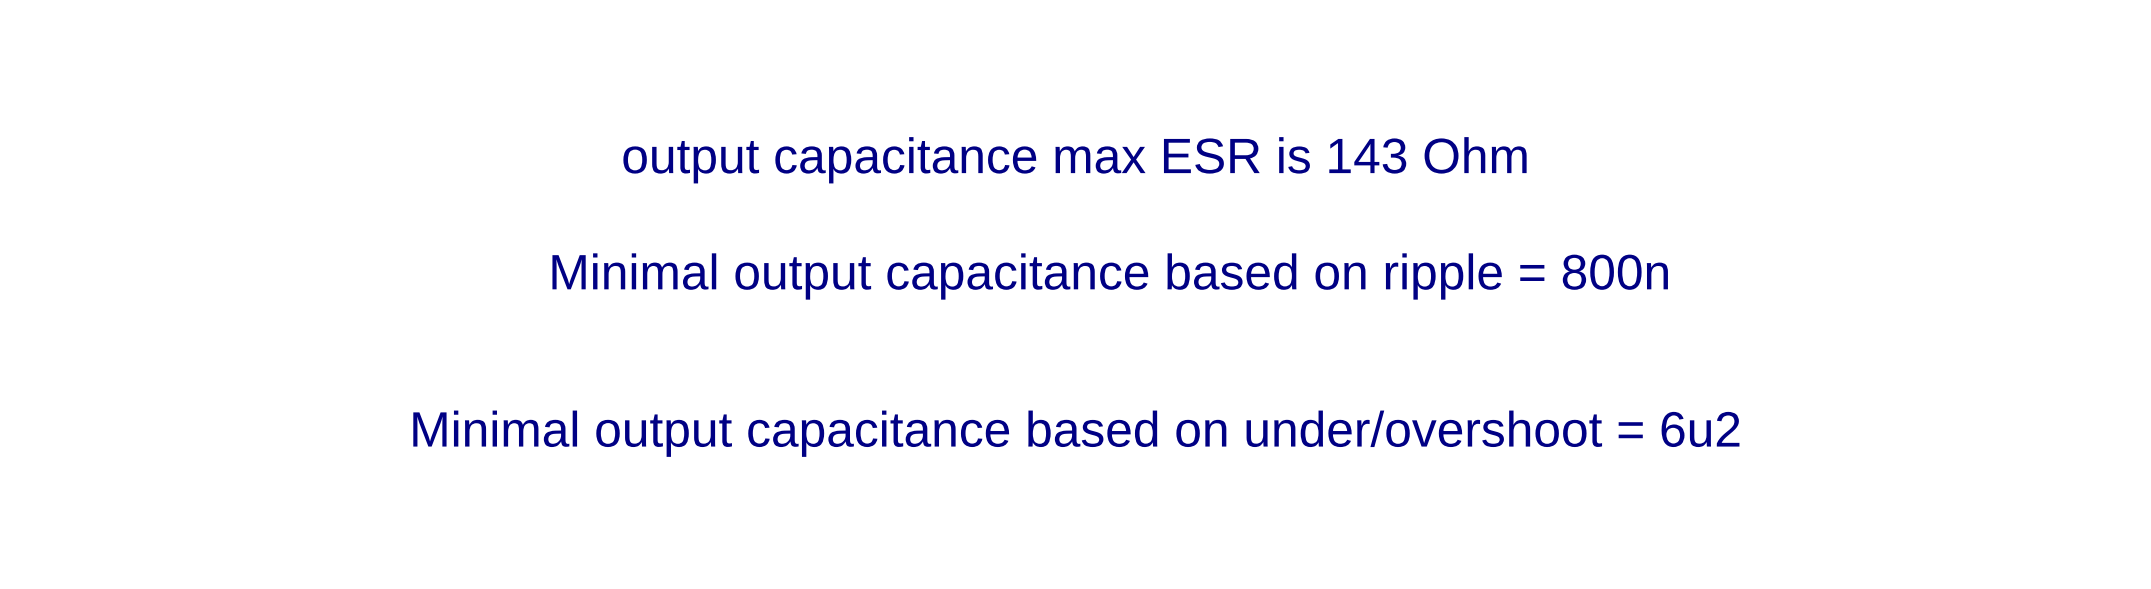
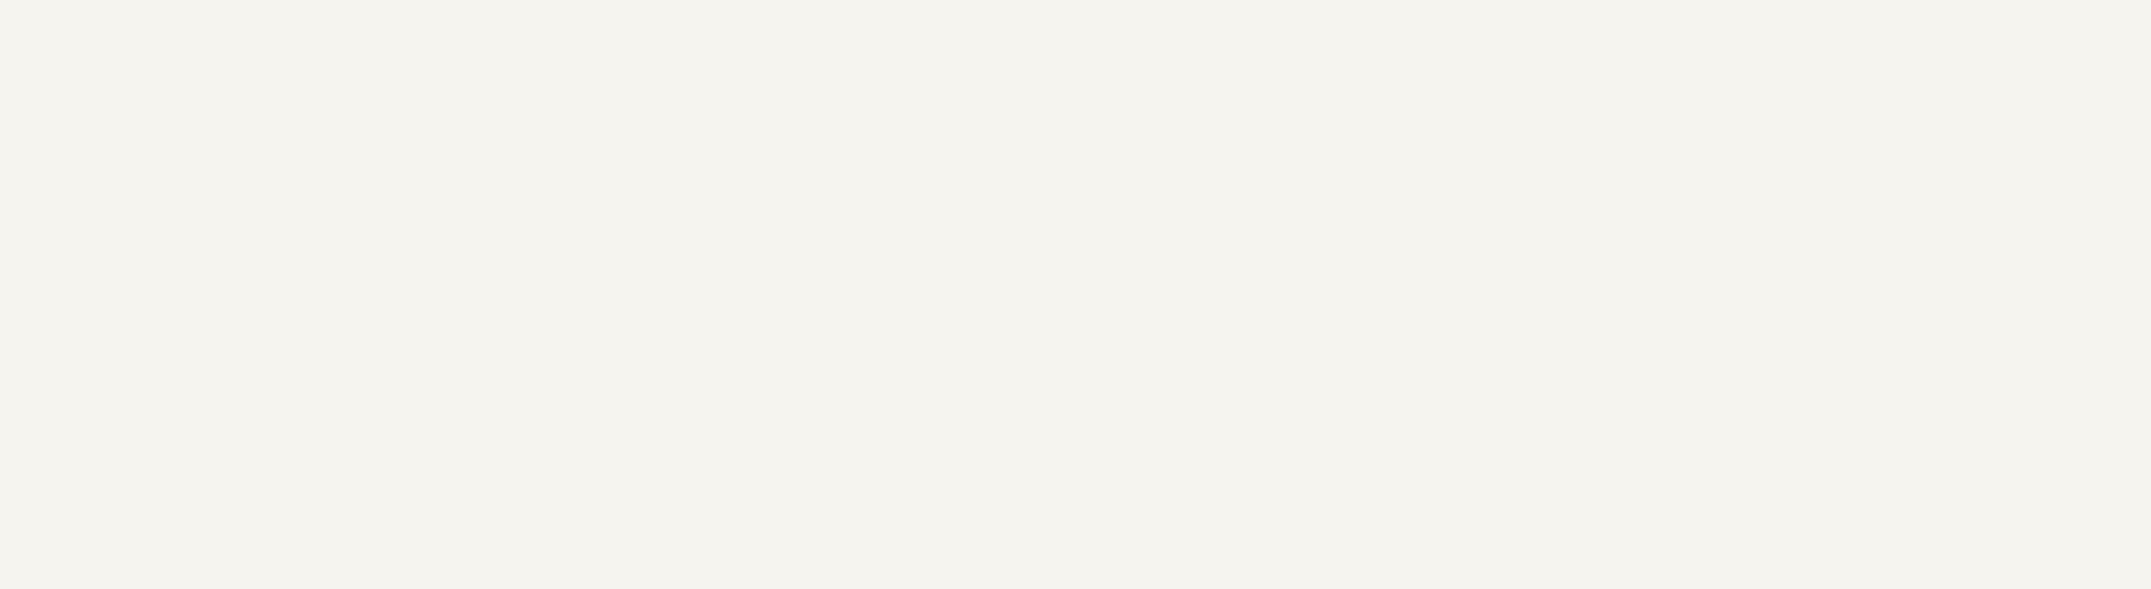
text: output capacitance max ESR is 143 Ohm (1075, 160) -> none
text: Minimal output capacitance based on ripple = 800n (1110, 276) -> none
text: Minimal output capacitance based on under/overshoot = 6u2 (1076, 433) -> none

